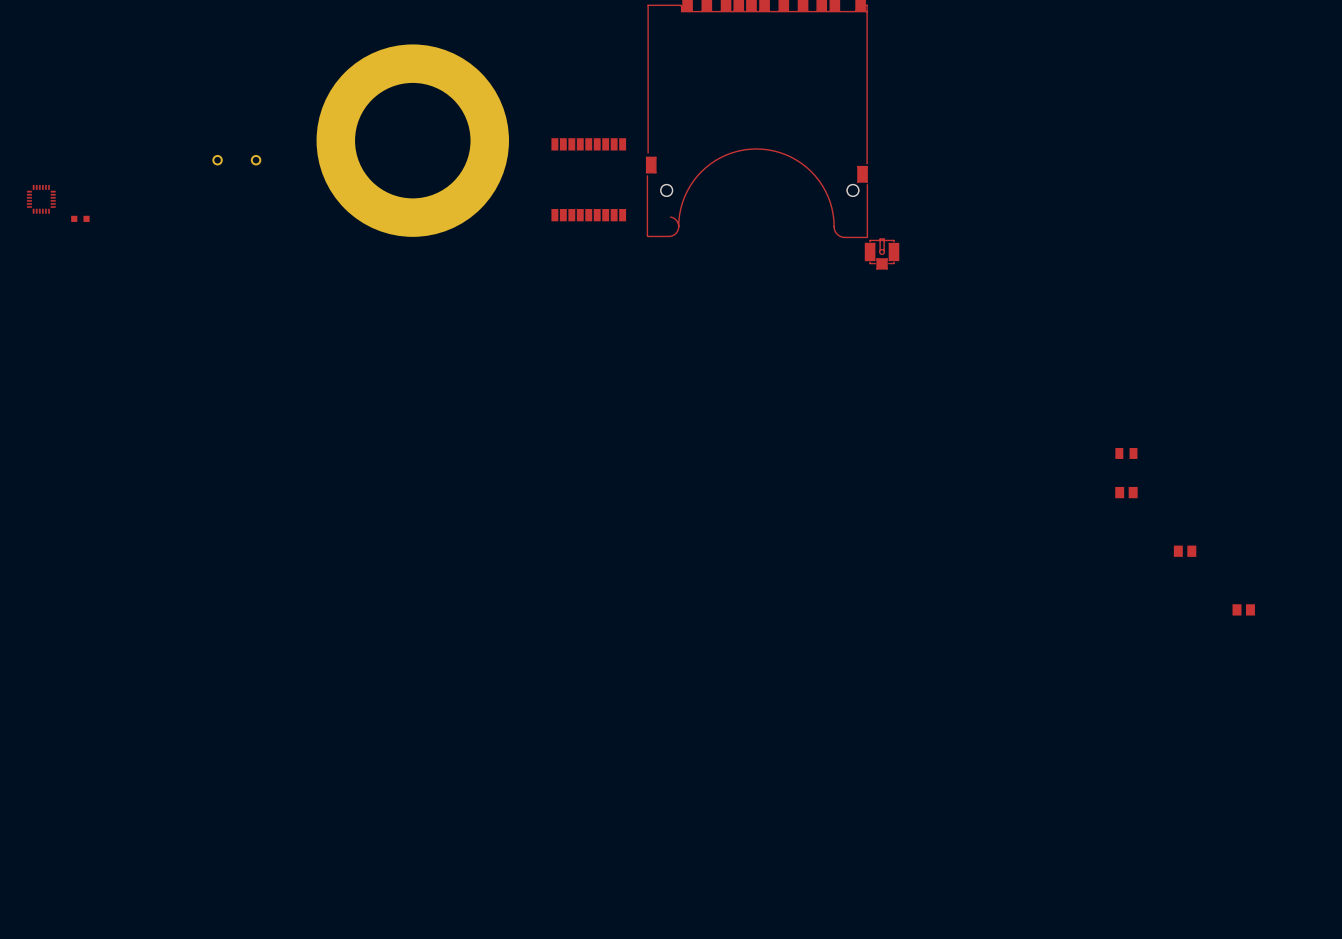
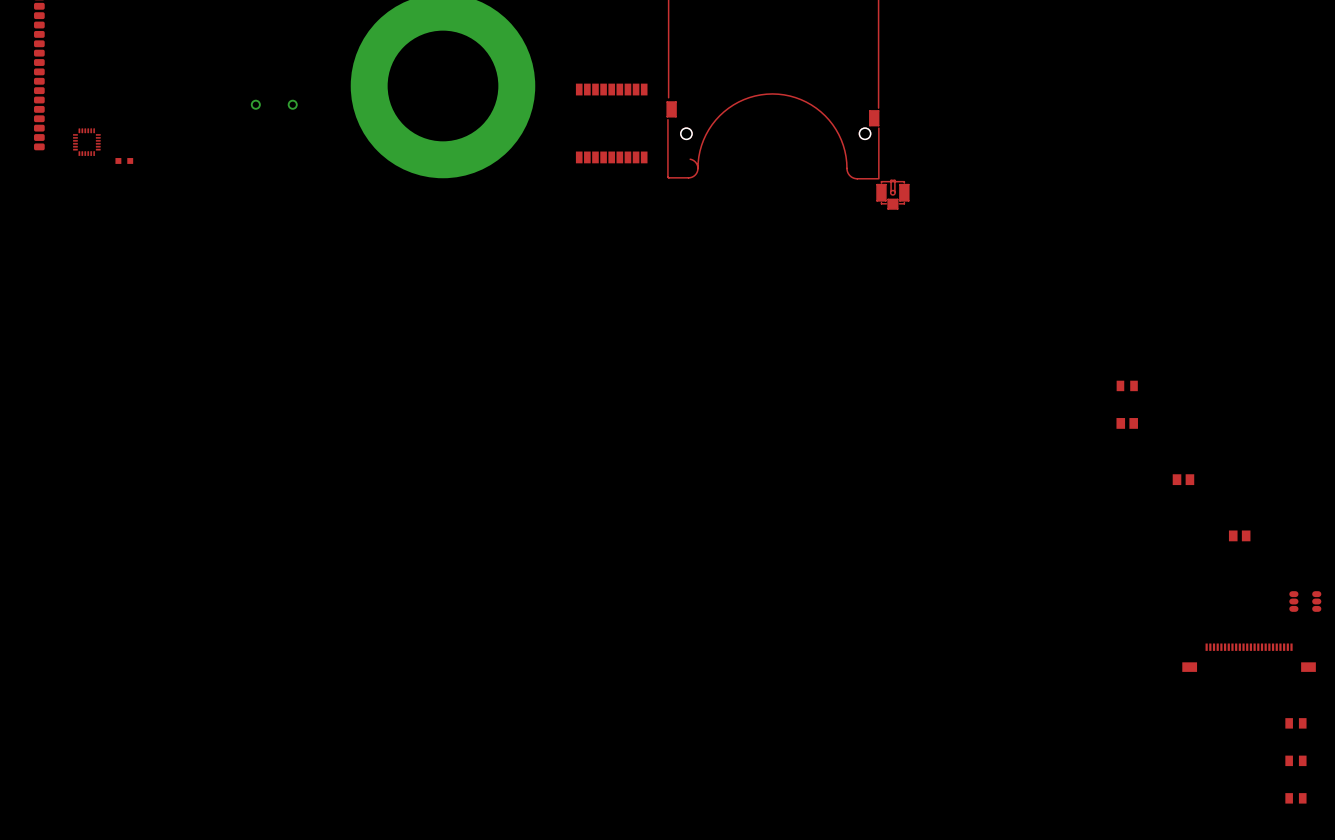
part: none -> (1305, 601)
part: none -> (1249, 657)
part: none -> (1295, 723)
part: none -> (1295, 760)
part: none -> (1295, 798)

